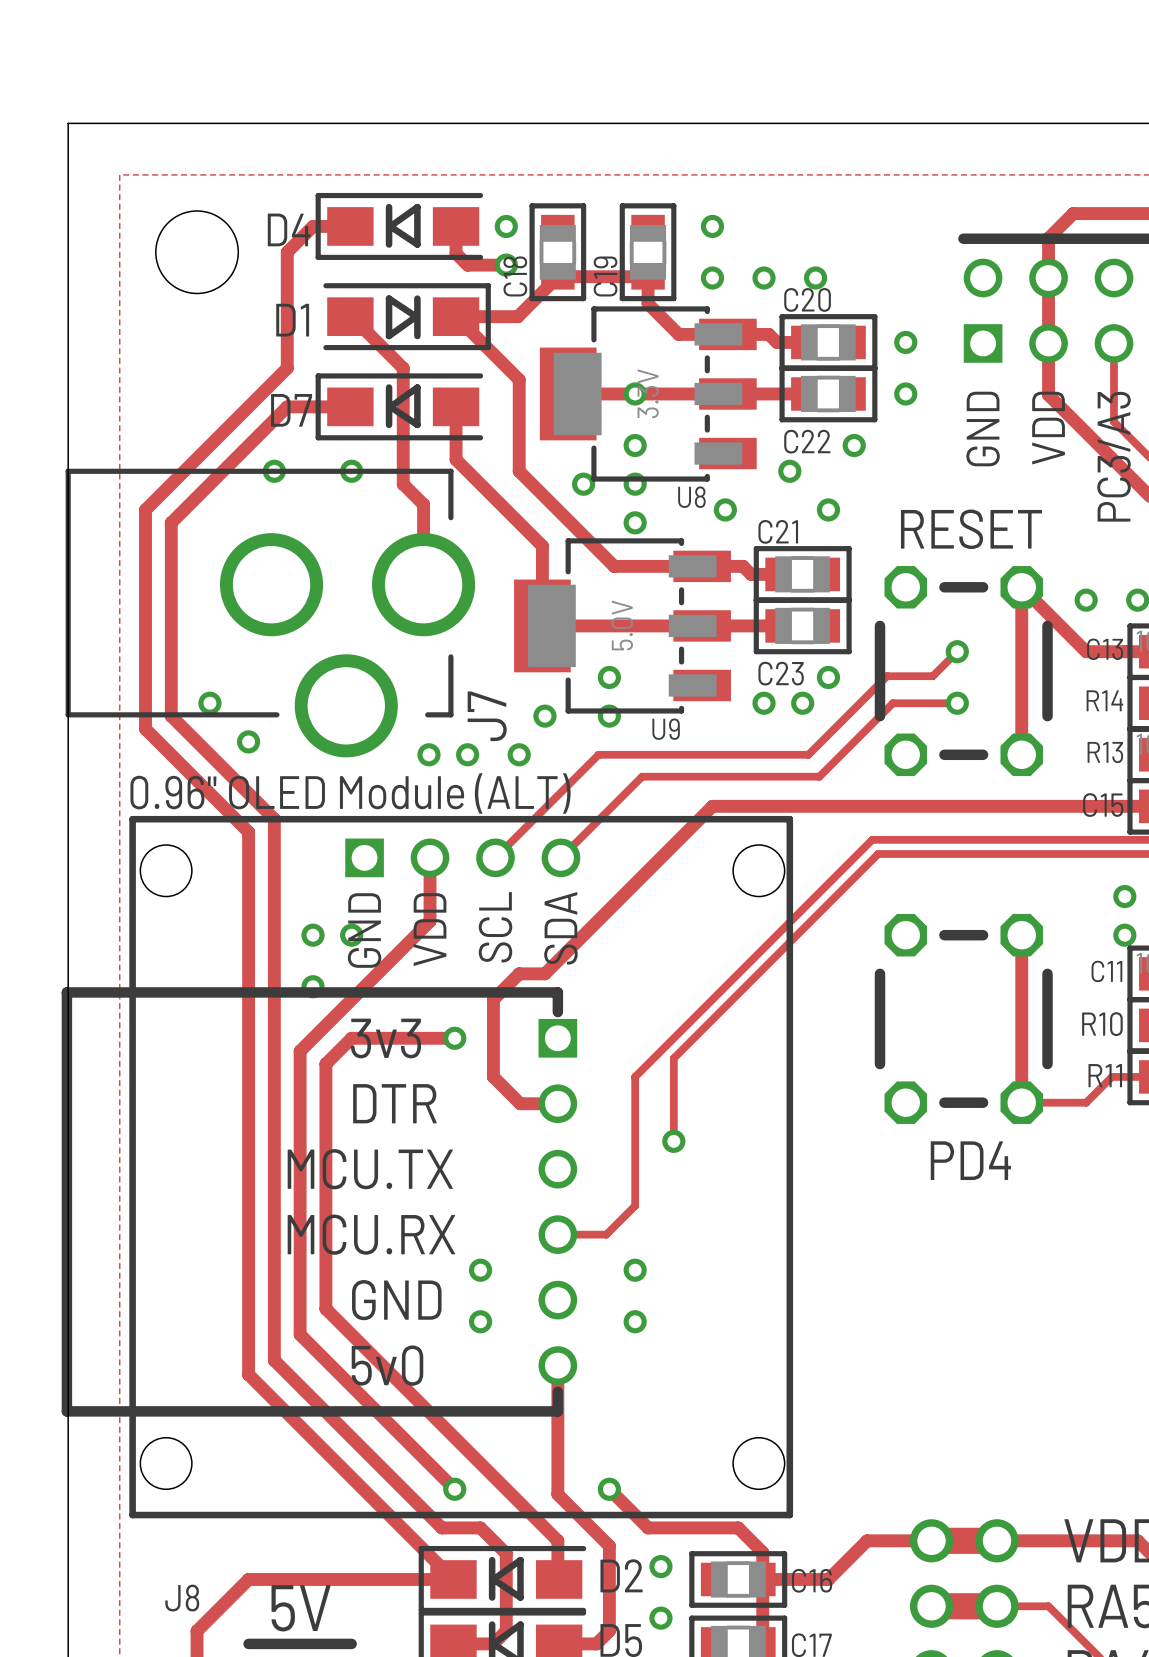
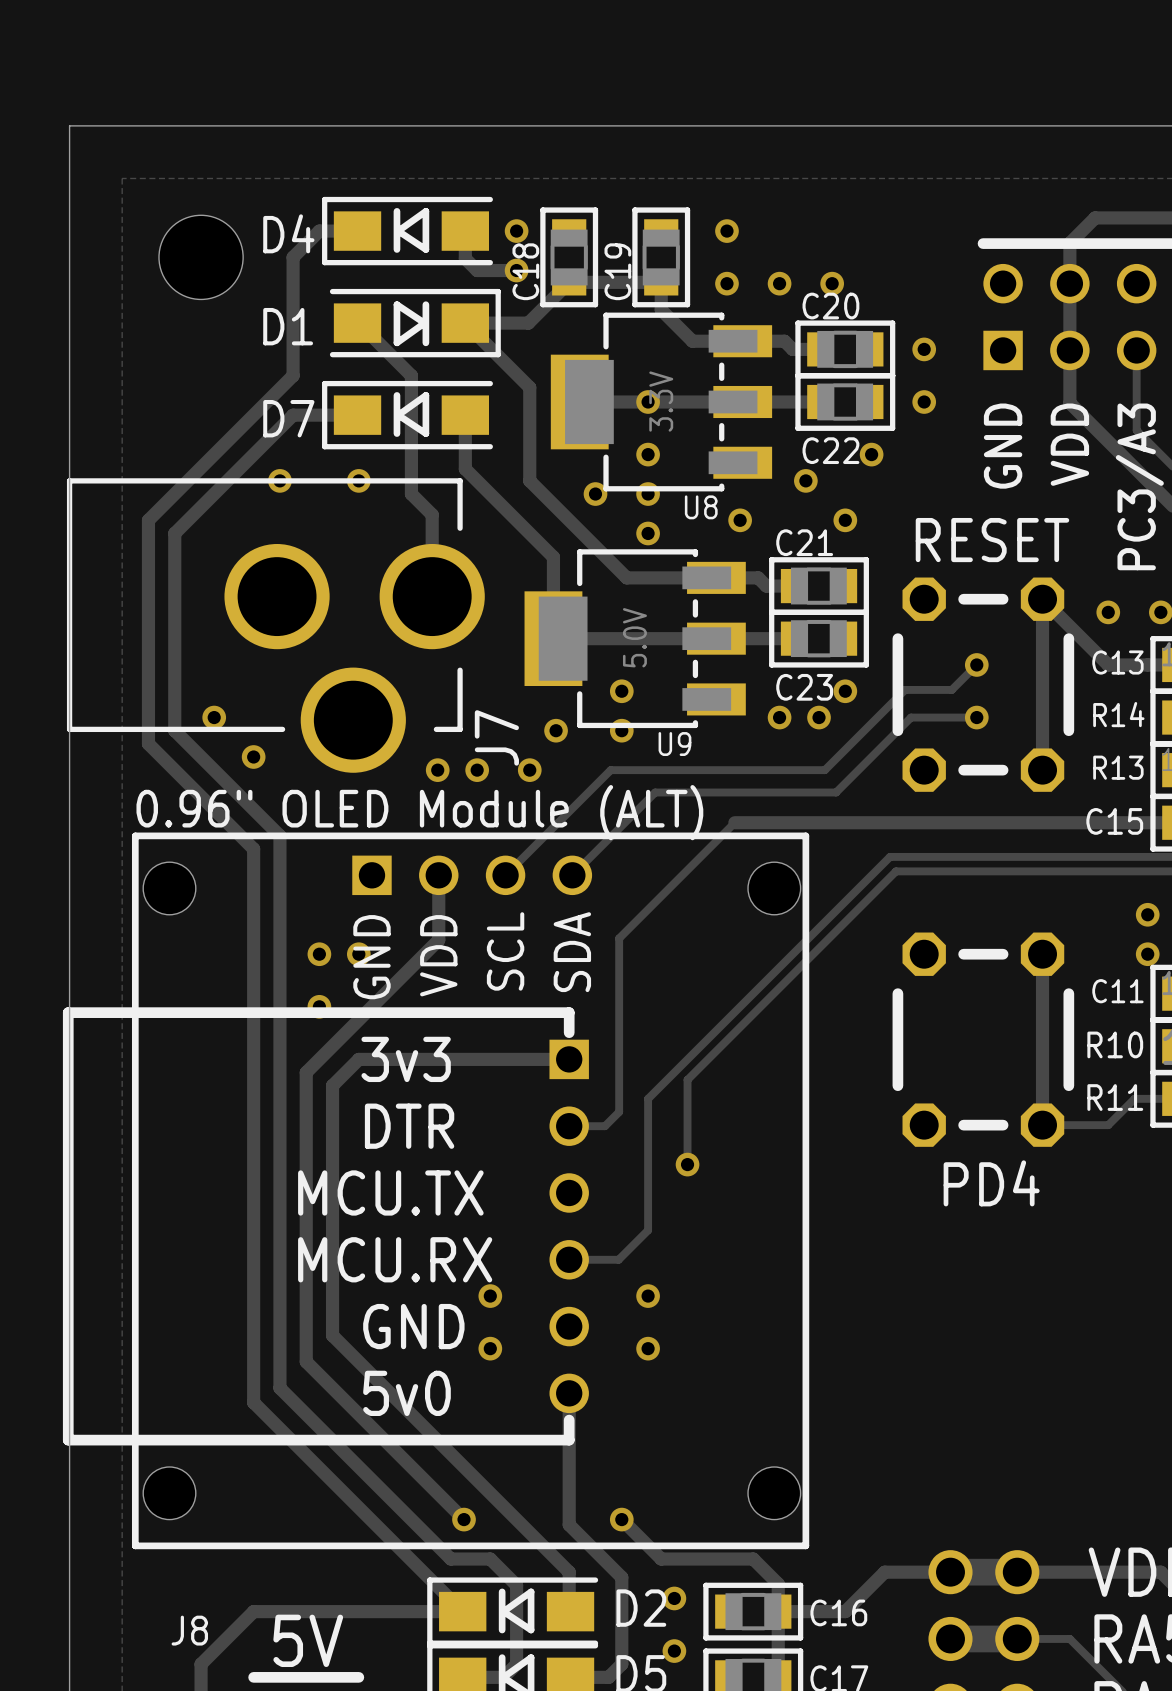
track: (720, 806) (712, 806) (544, 973) (519, 973) (493, 999) (493, 1076) (520, 1103) (557, 1103) -> (734, 822) (619, 938) (619, 1111) (604, 1126) (569, 1126)
track: none -> (464, 1059) (569, 1059)
via: (454, 1038) -> none

